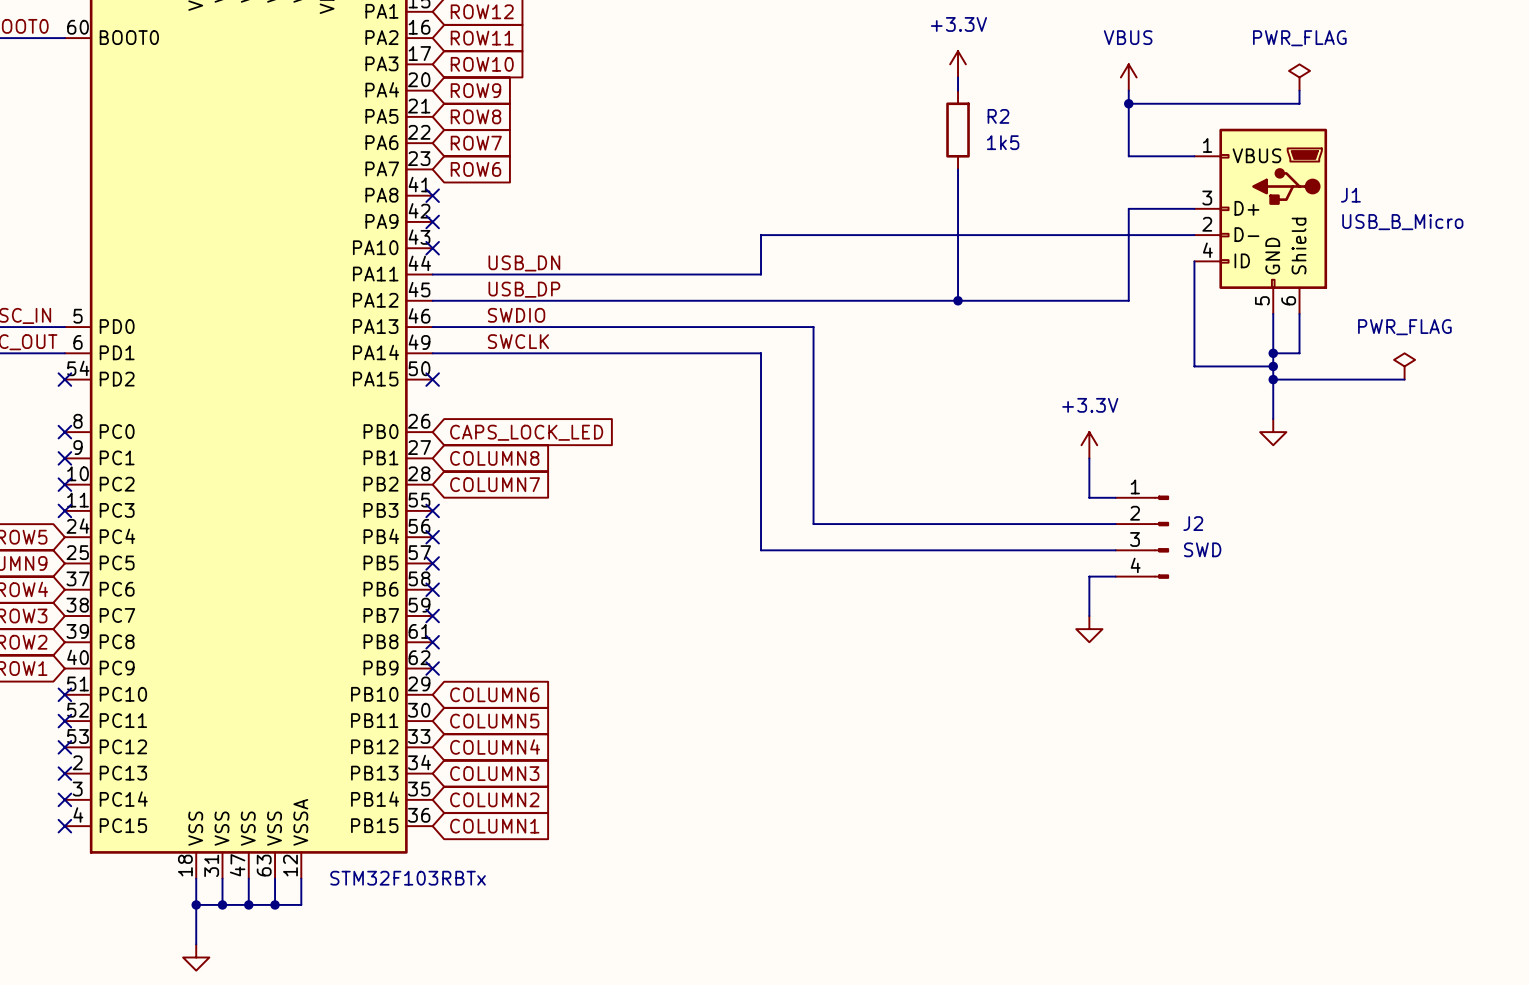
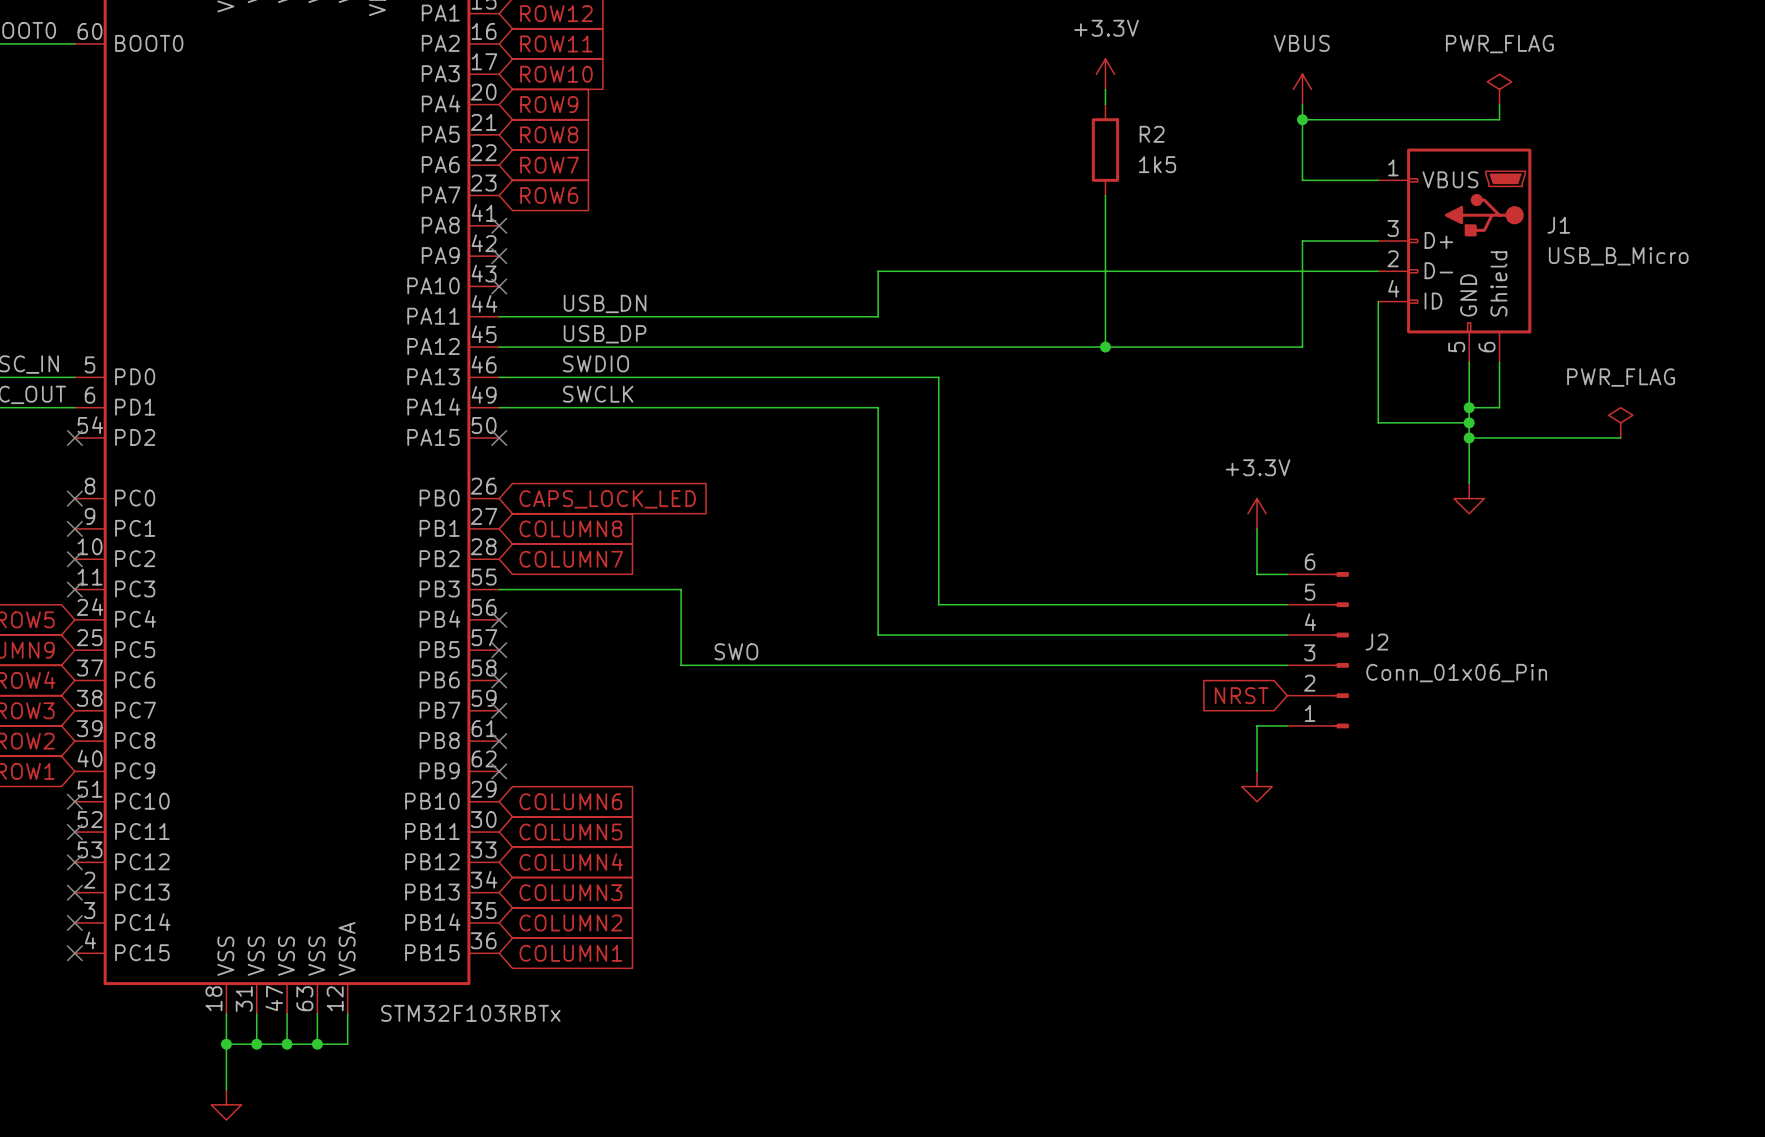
J2 symbol: [1115, 495, 1169, 579] -> [1287, 571, 1349, 729]
no-connect mark: (432, 510) -> none
J2 value: SWD (1202, 549) -> Conn_01x06_Pin (1456, 673)
label: none -> SWO (736, 651)
wire: (1089, 576) (1089, 616) -> (1257, 665) (681, 665) (681, 589) (499, 589)
global label: none -> NRST (1241, 695)
power symbol position: (1089, 629) -> (1257, 786)
wire: none -> (1287, 725) (1257, 725) (1257, 771)

